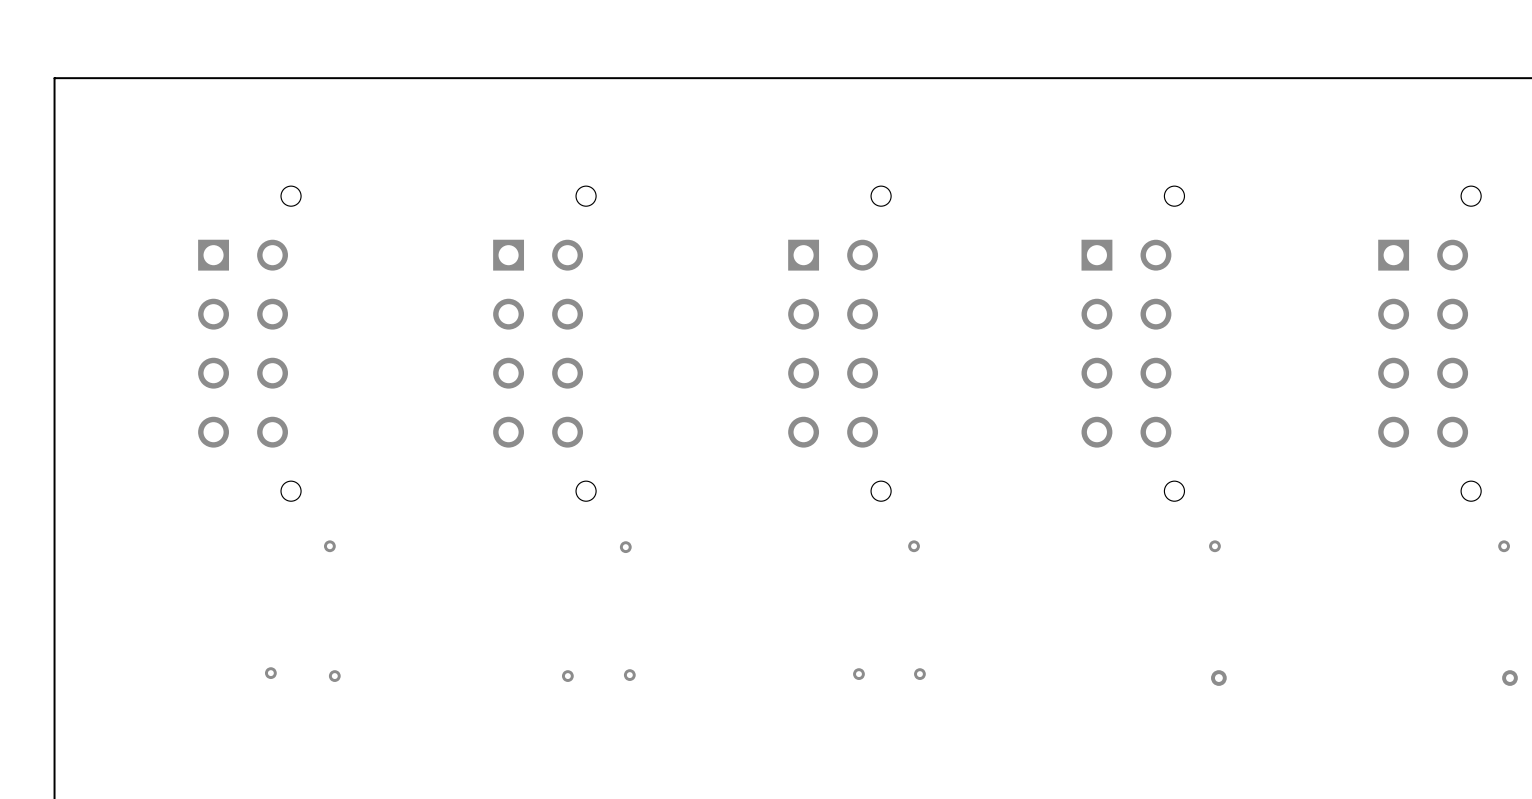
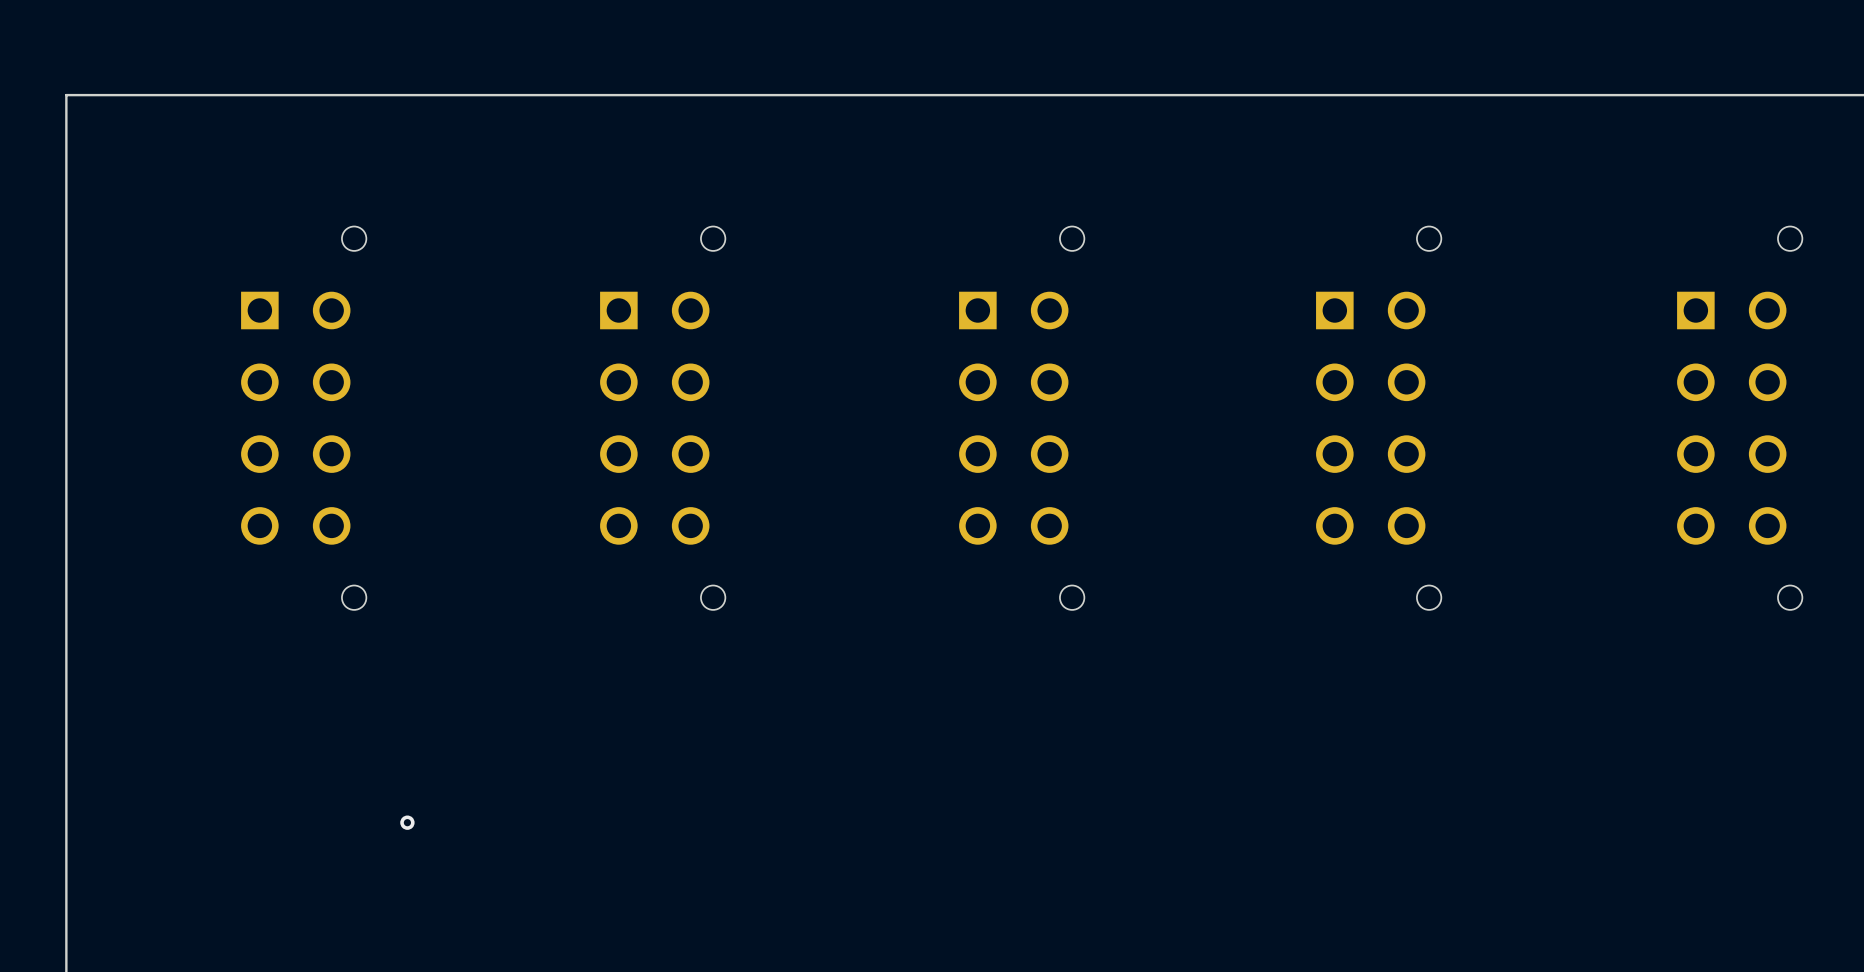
via: (329, 546) -> none
via: (914, 546) -> none
via: (1214, 546) -> none
via: (1504, 546) -> none
via: (625, 547) -> none
via: (270, 673) -> none
via: (858, 674) -> none
via: (919, 674) -> none
via: (629, 675) -> none
via: (567, 676) -> none
via: (1218, 678) -> none
via: (1509, 678) -> none

